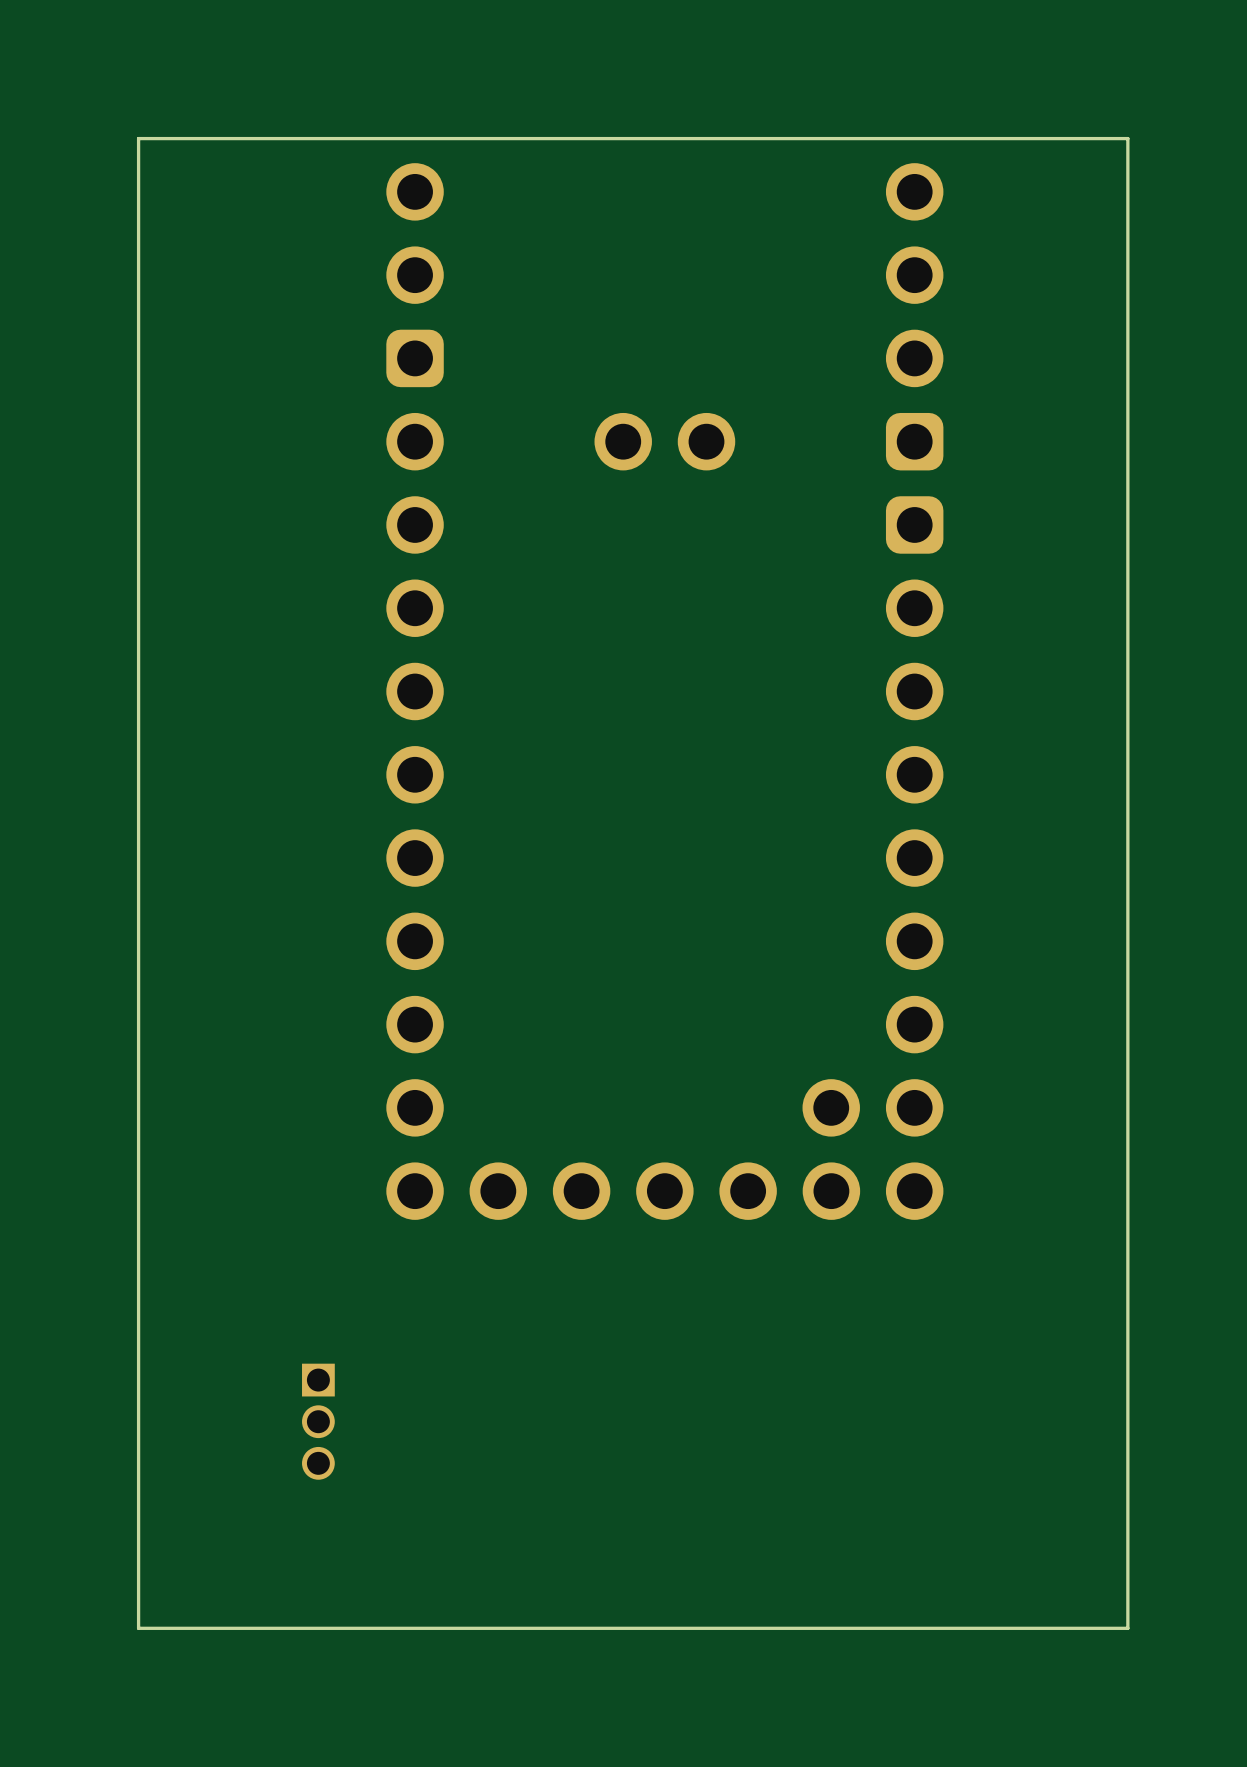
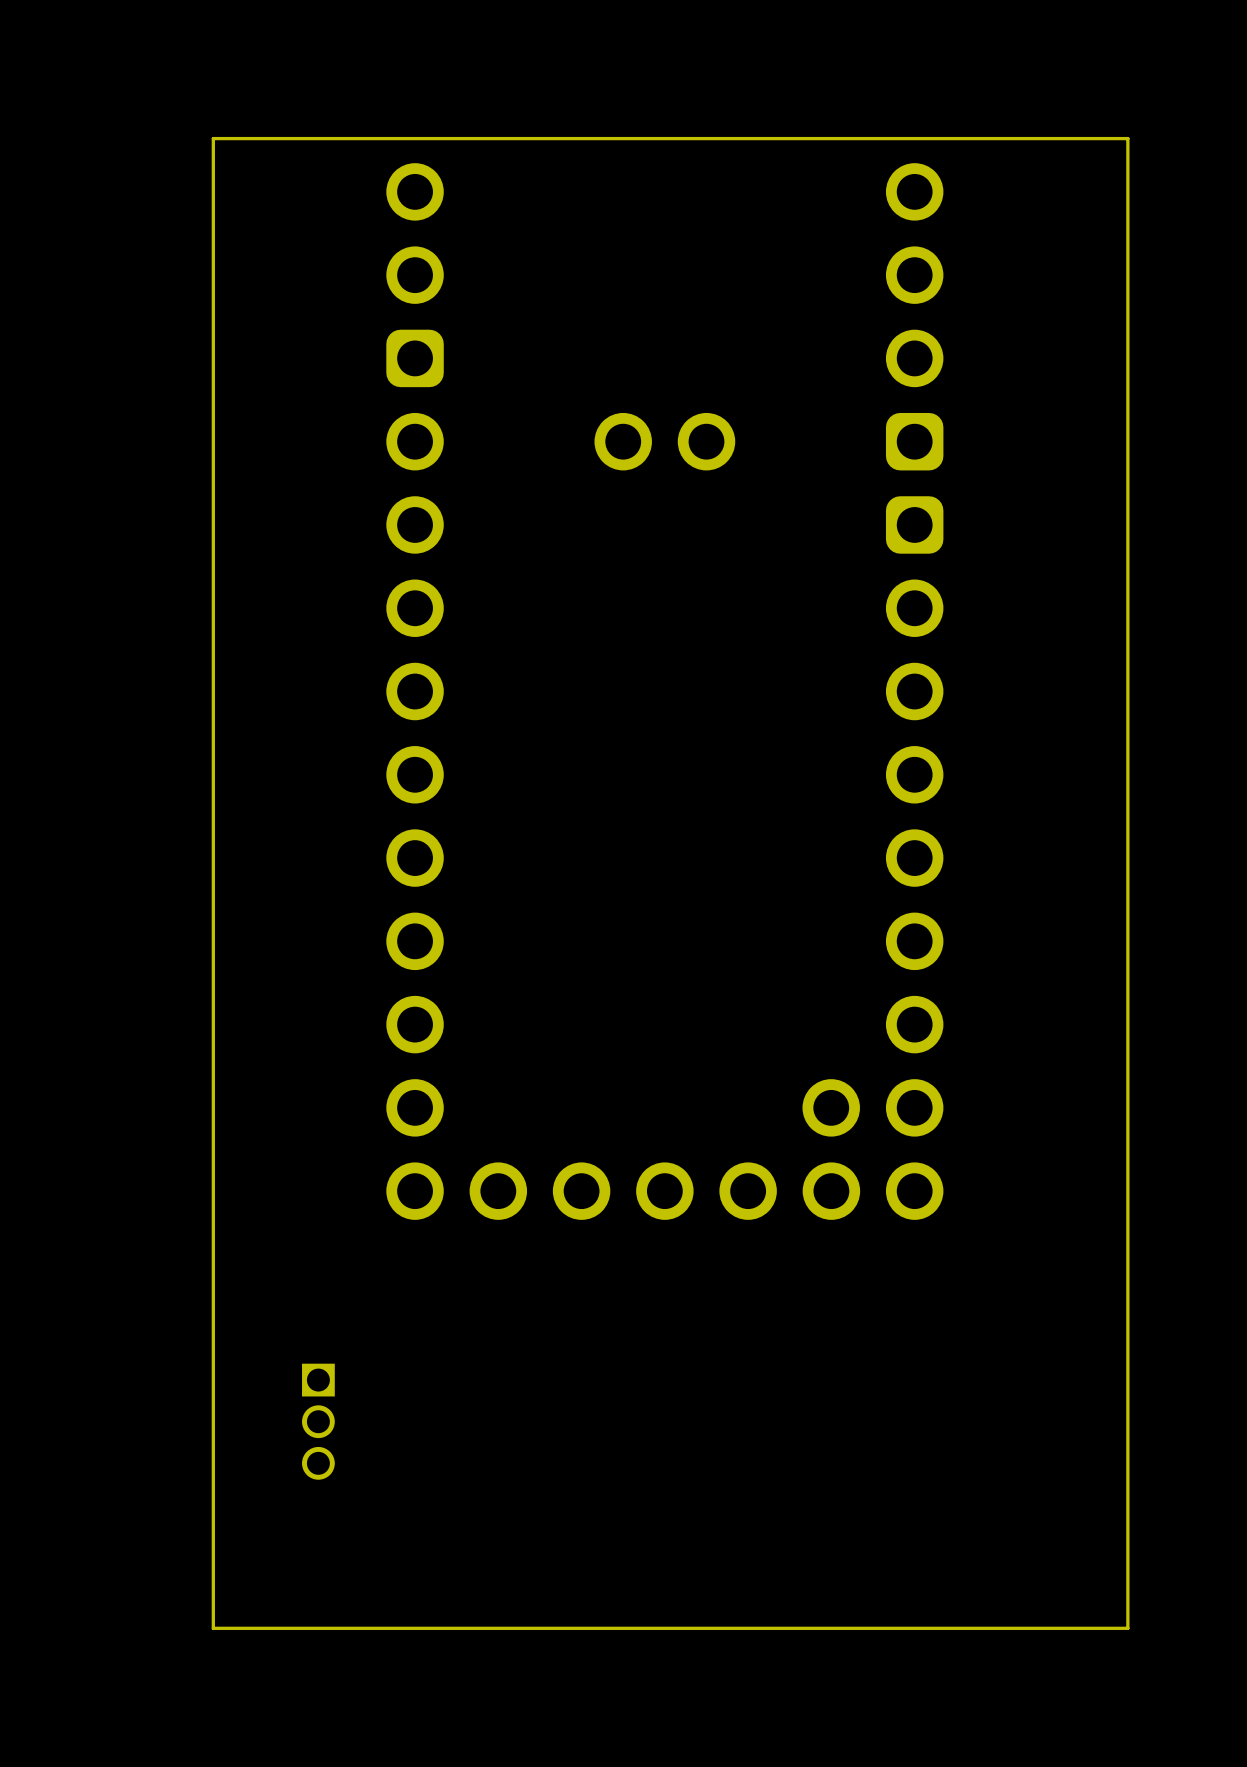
board edge: (213, 138) (138, 138) (138, 1628) (213, 1628) -> (213, 138) (213, 1628)

